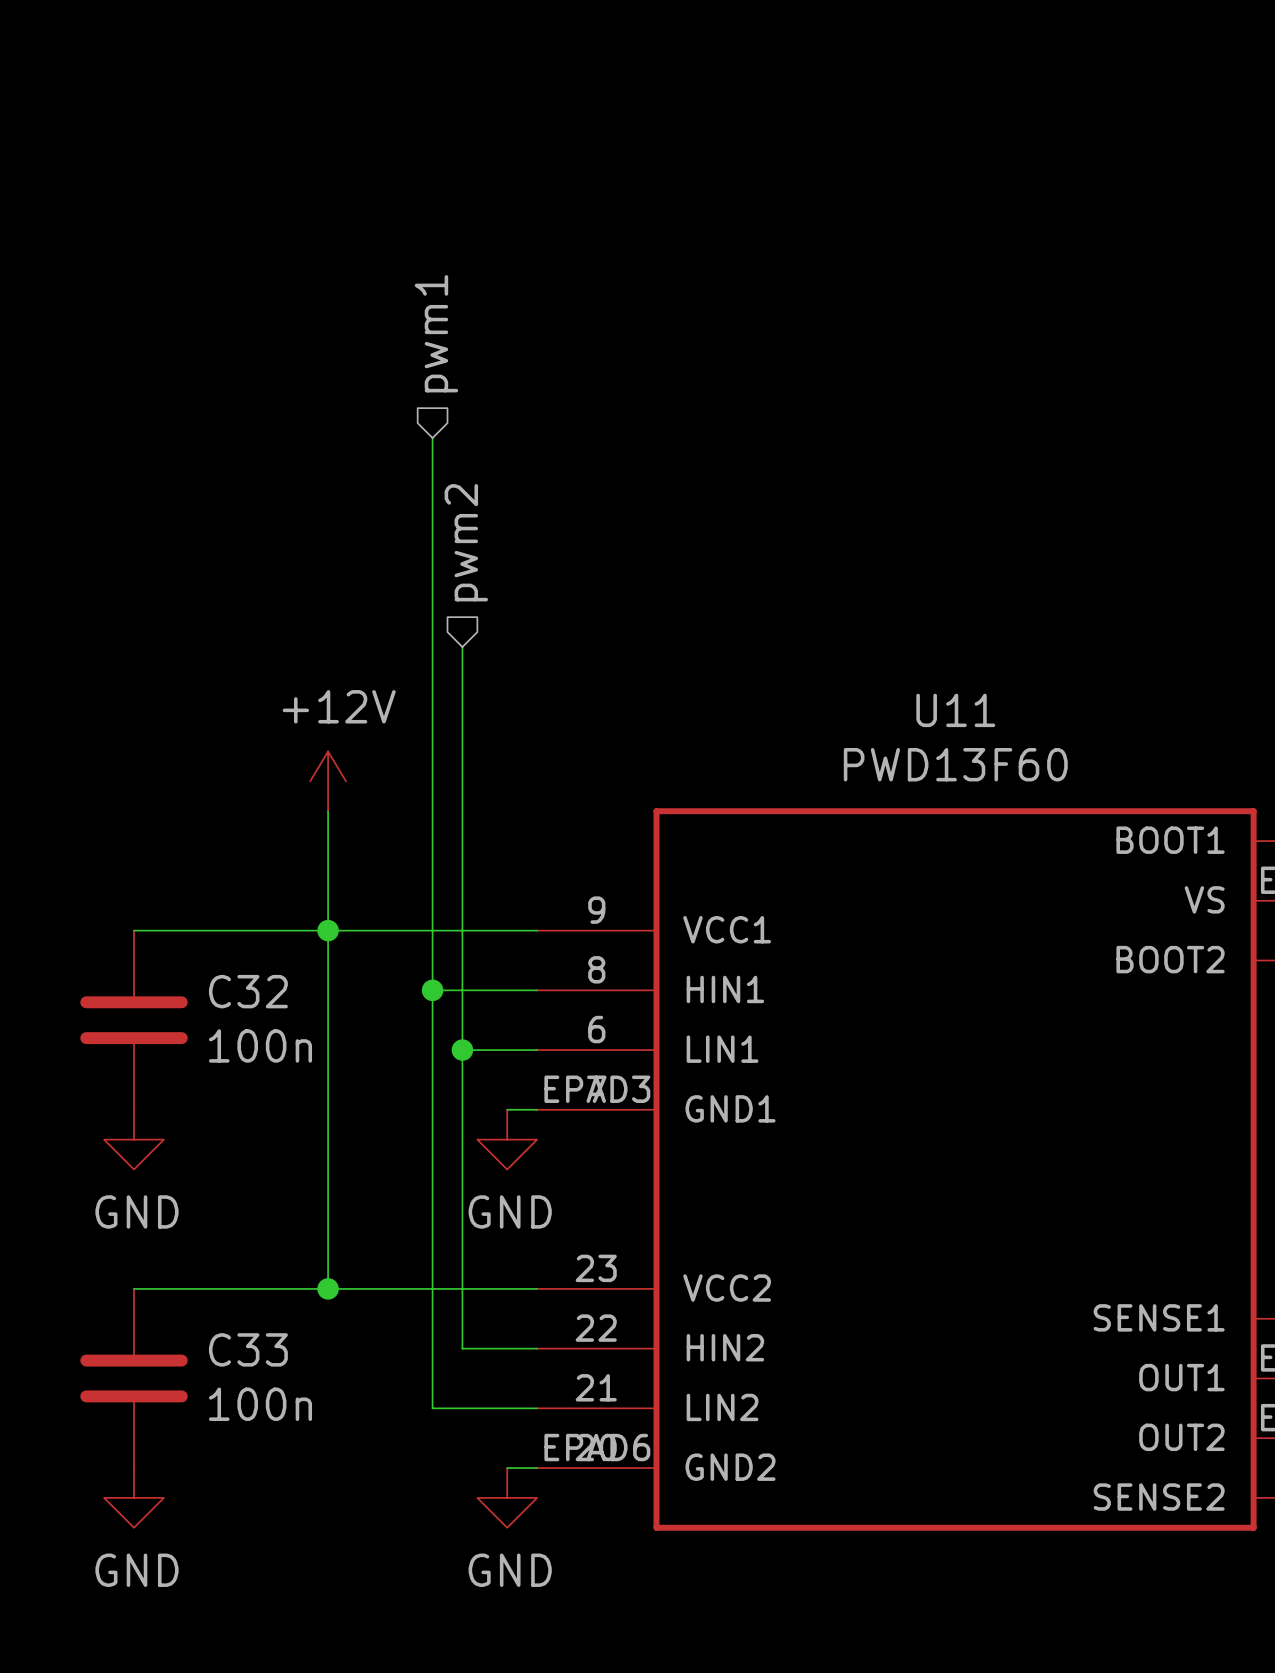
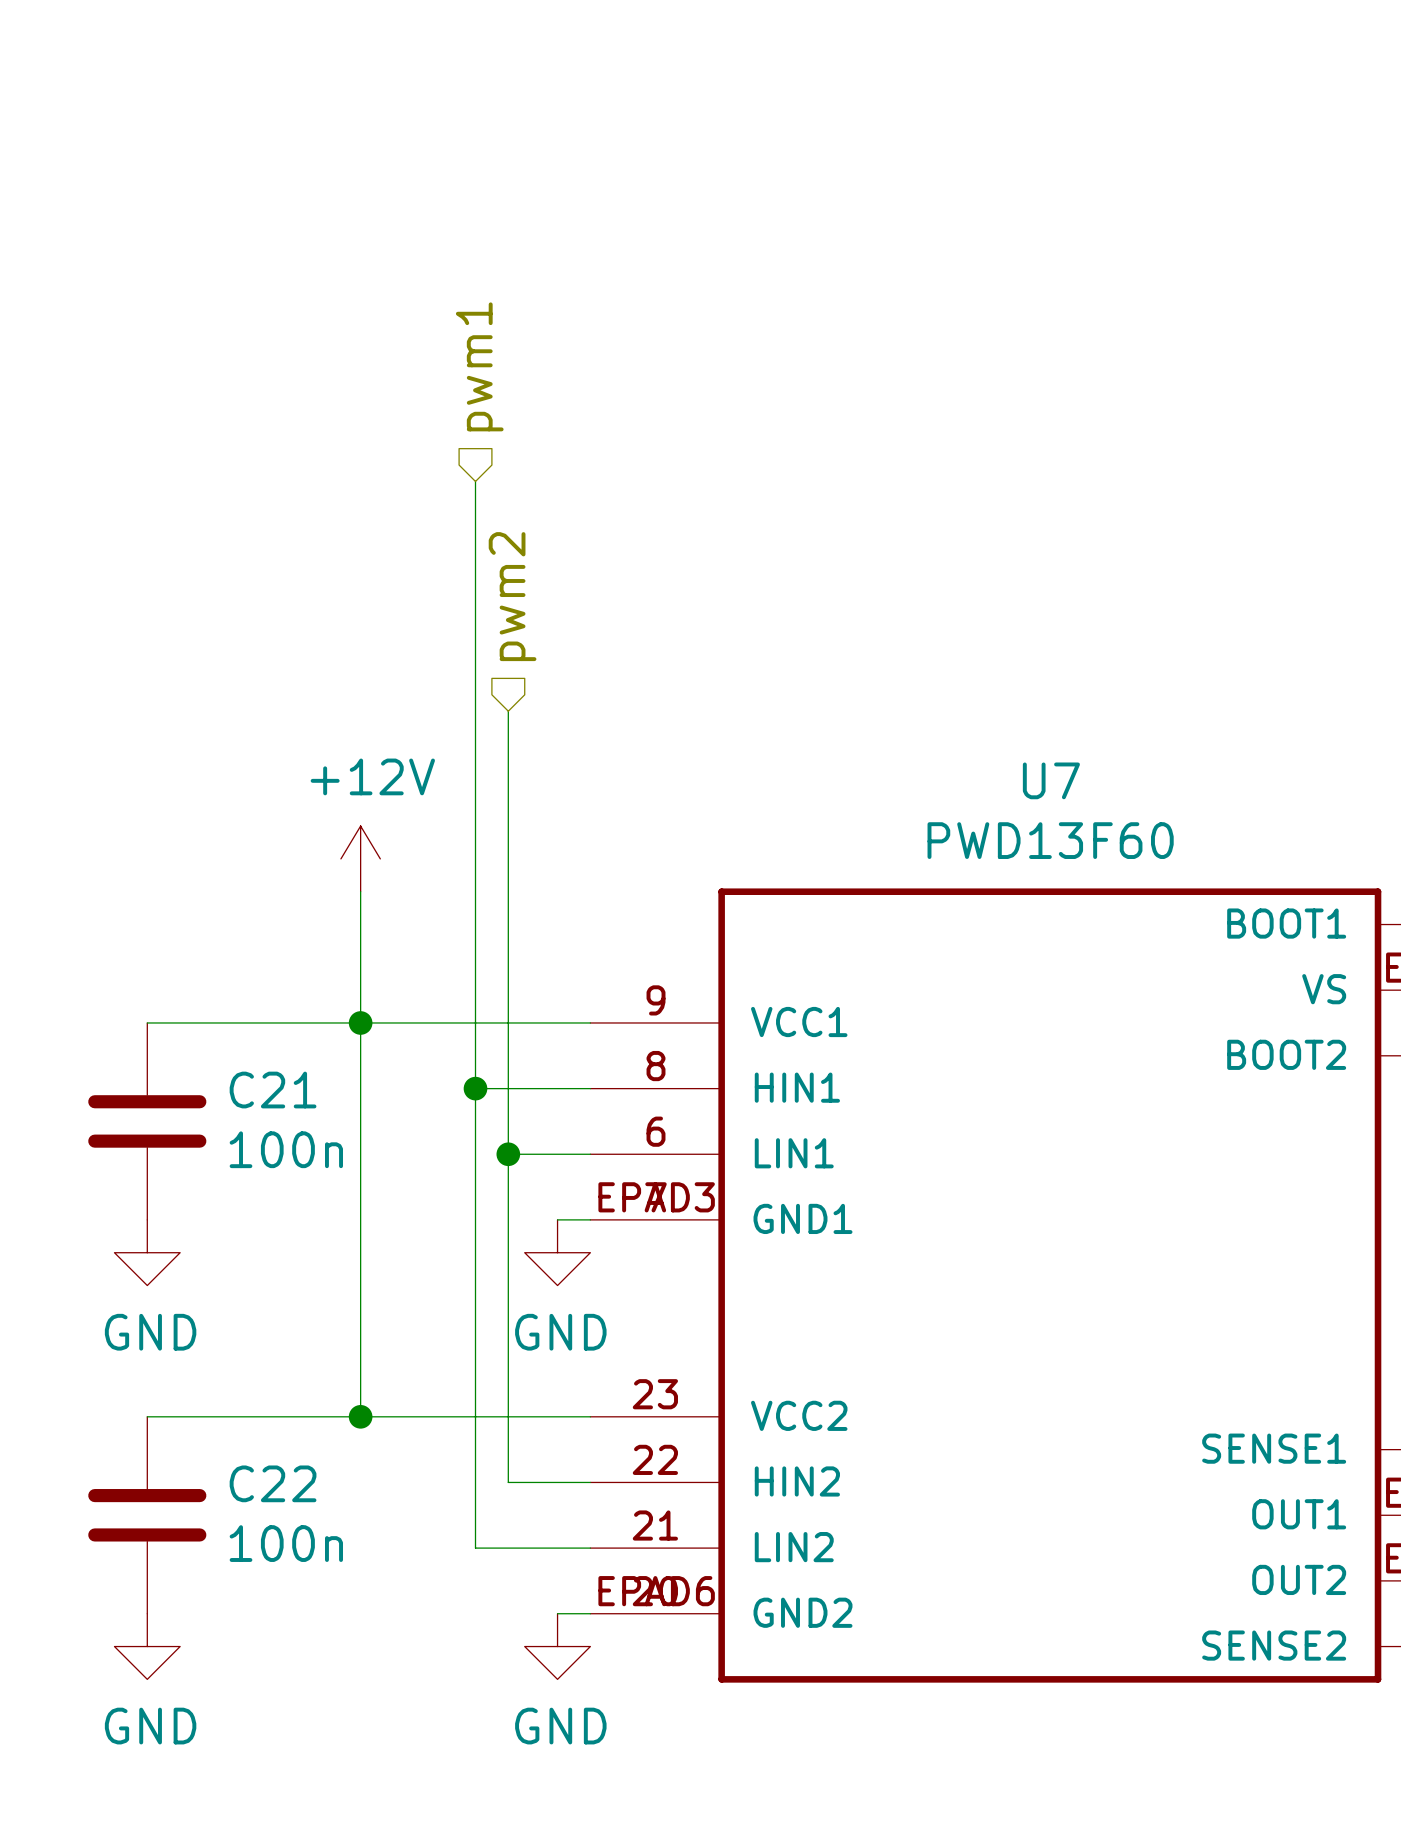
U11 name: U11 (955, 710) -> U7 (1051, 780)
C32 name: C32 (248, 991) -> C21 (273, 1090)
C33 name: C33 (248, 1349) -> C22 (273, 1483)

